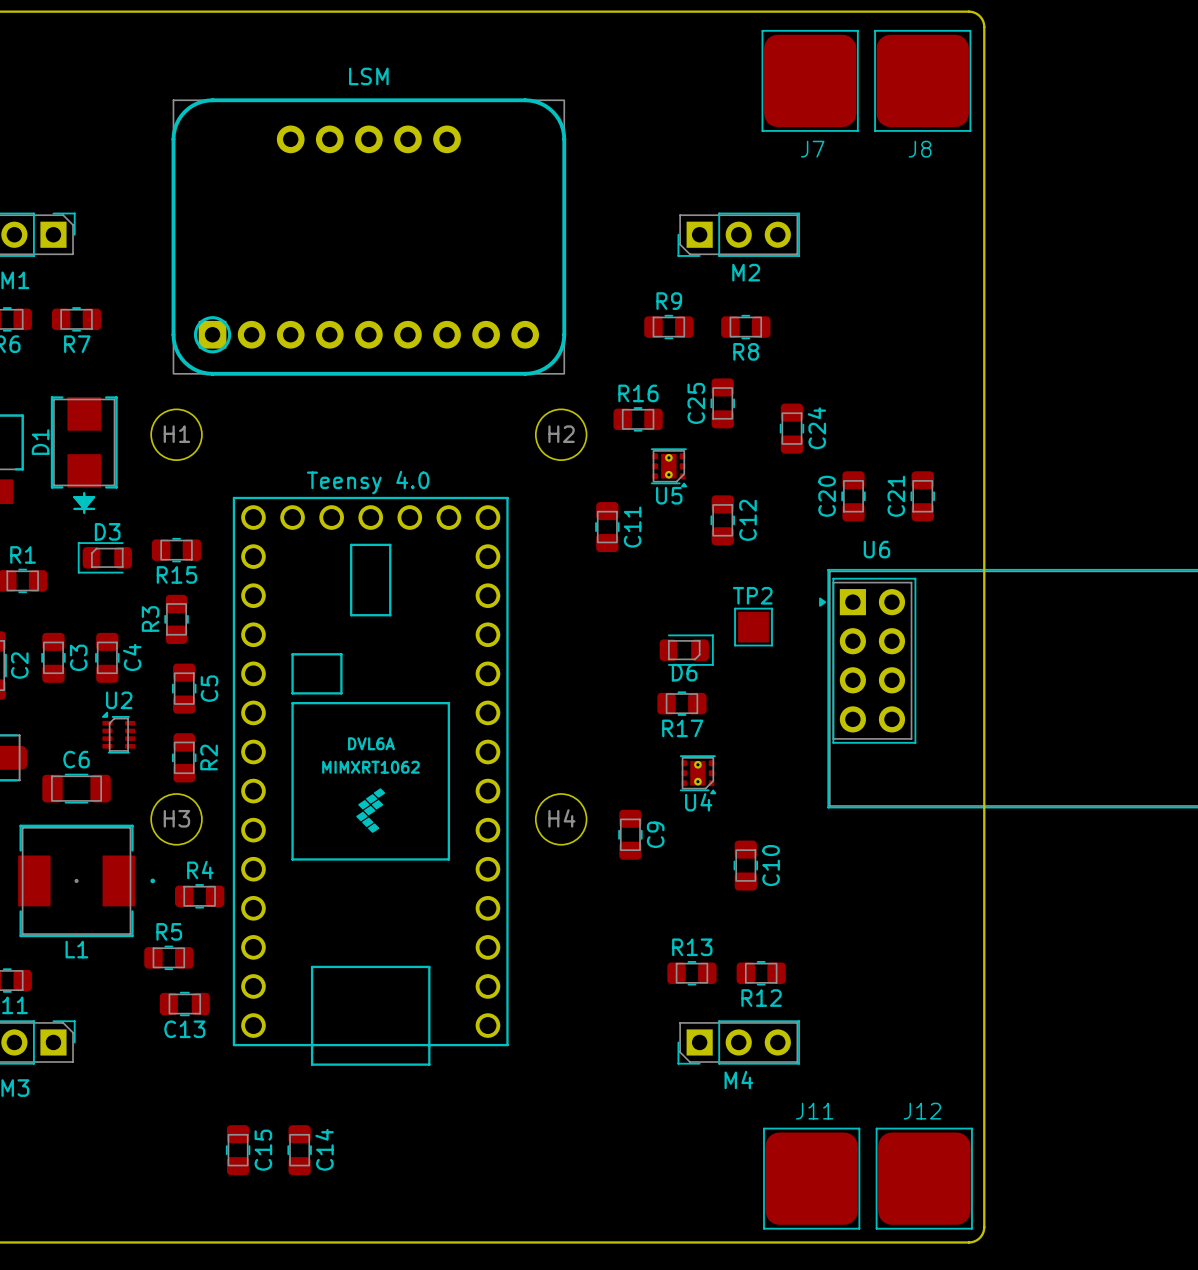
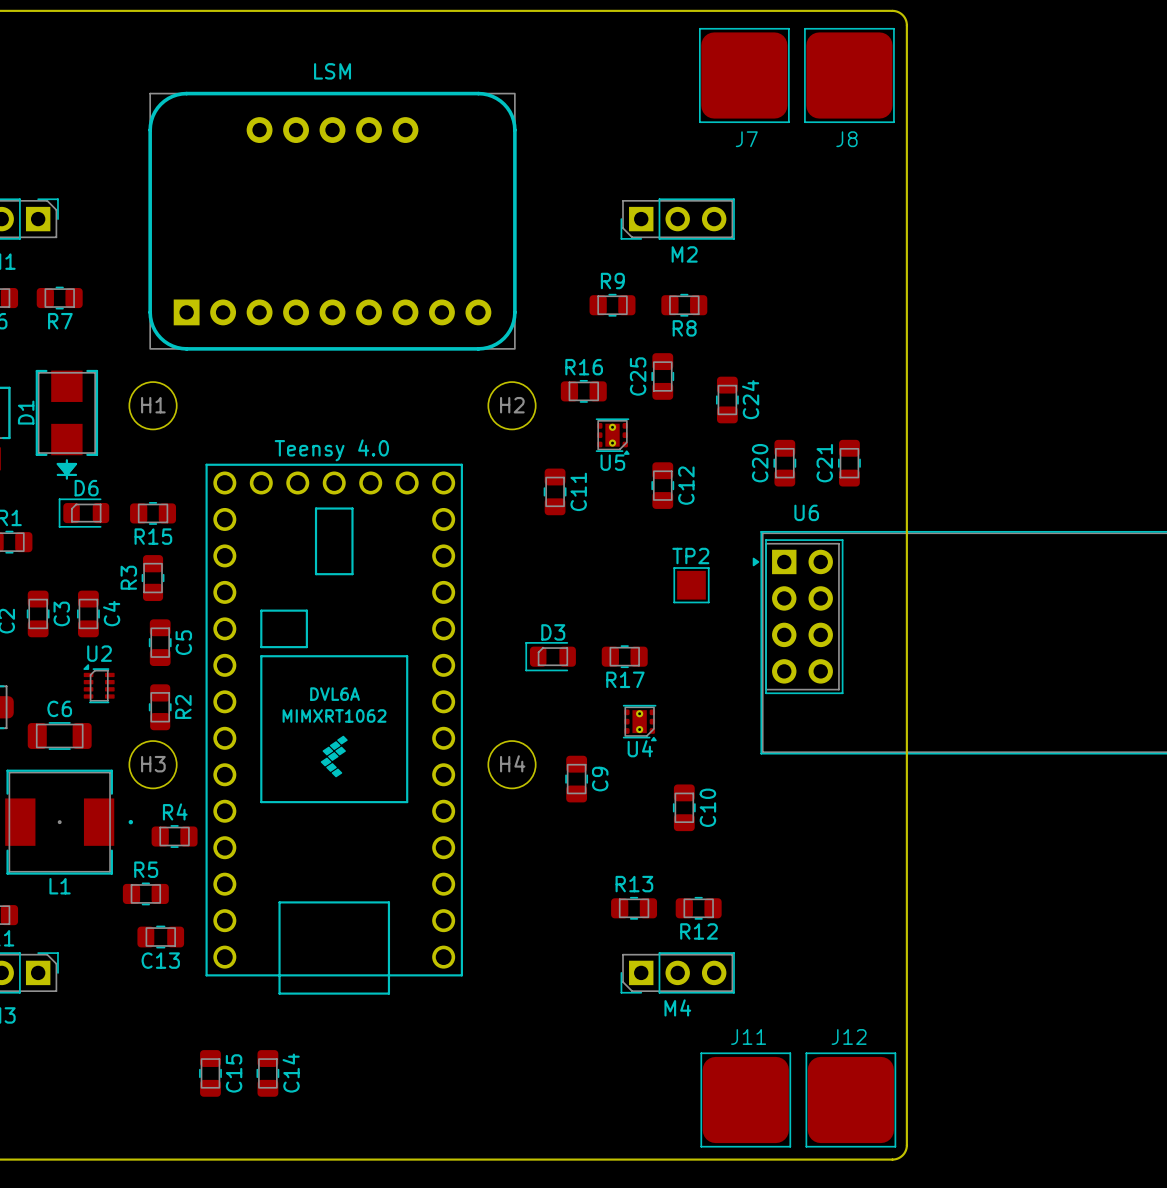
LSM footprint: [171, 98, 567, 376] -> [148, 91, 517, 351]
Teensy 4.0 footprint: [232, 496, 509, 1066] -> [205, 463, 463, 995]
D3 position: (104, 557) -> (550, 656)
D6 rotation: 0° (686, 650) -> 180° (83, 513)
D6 position: (686, 650) -> (83, 513)

